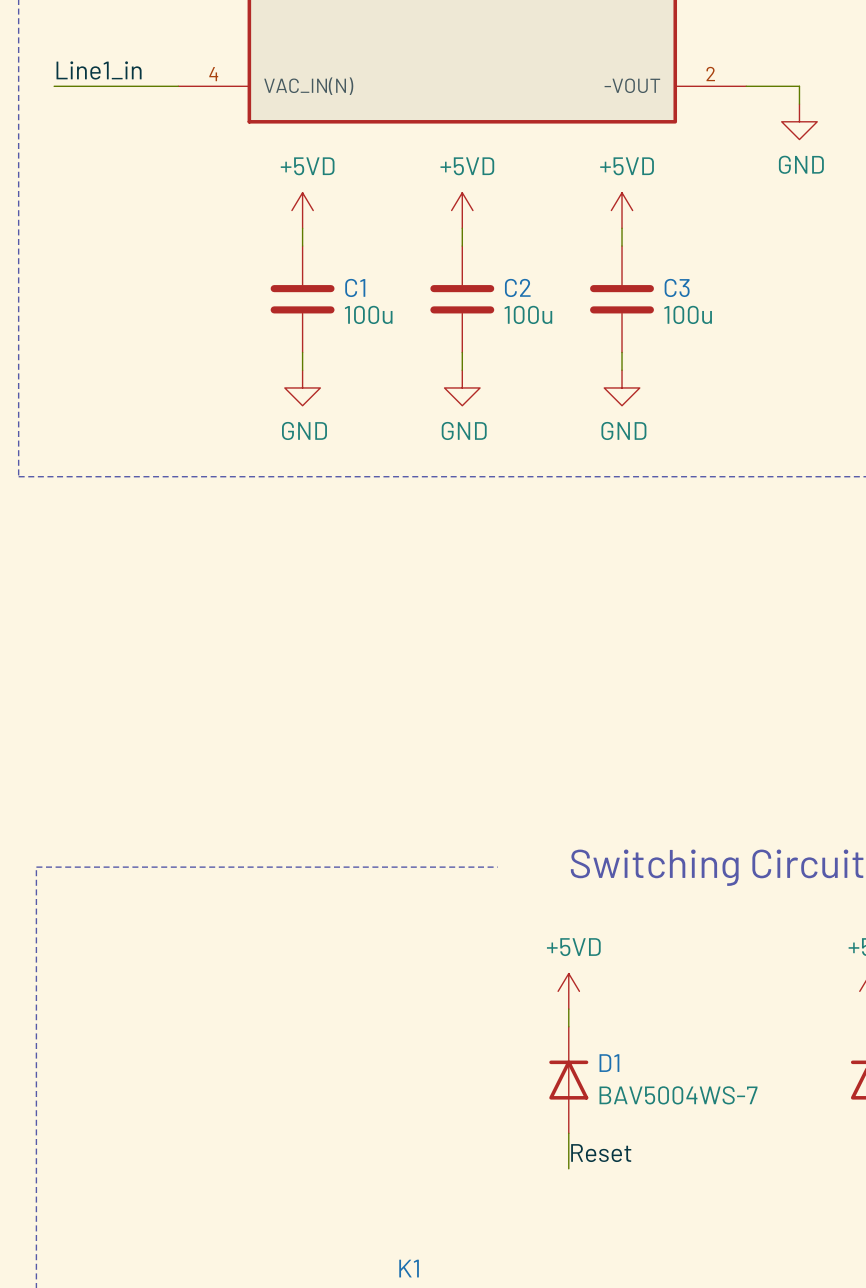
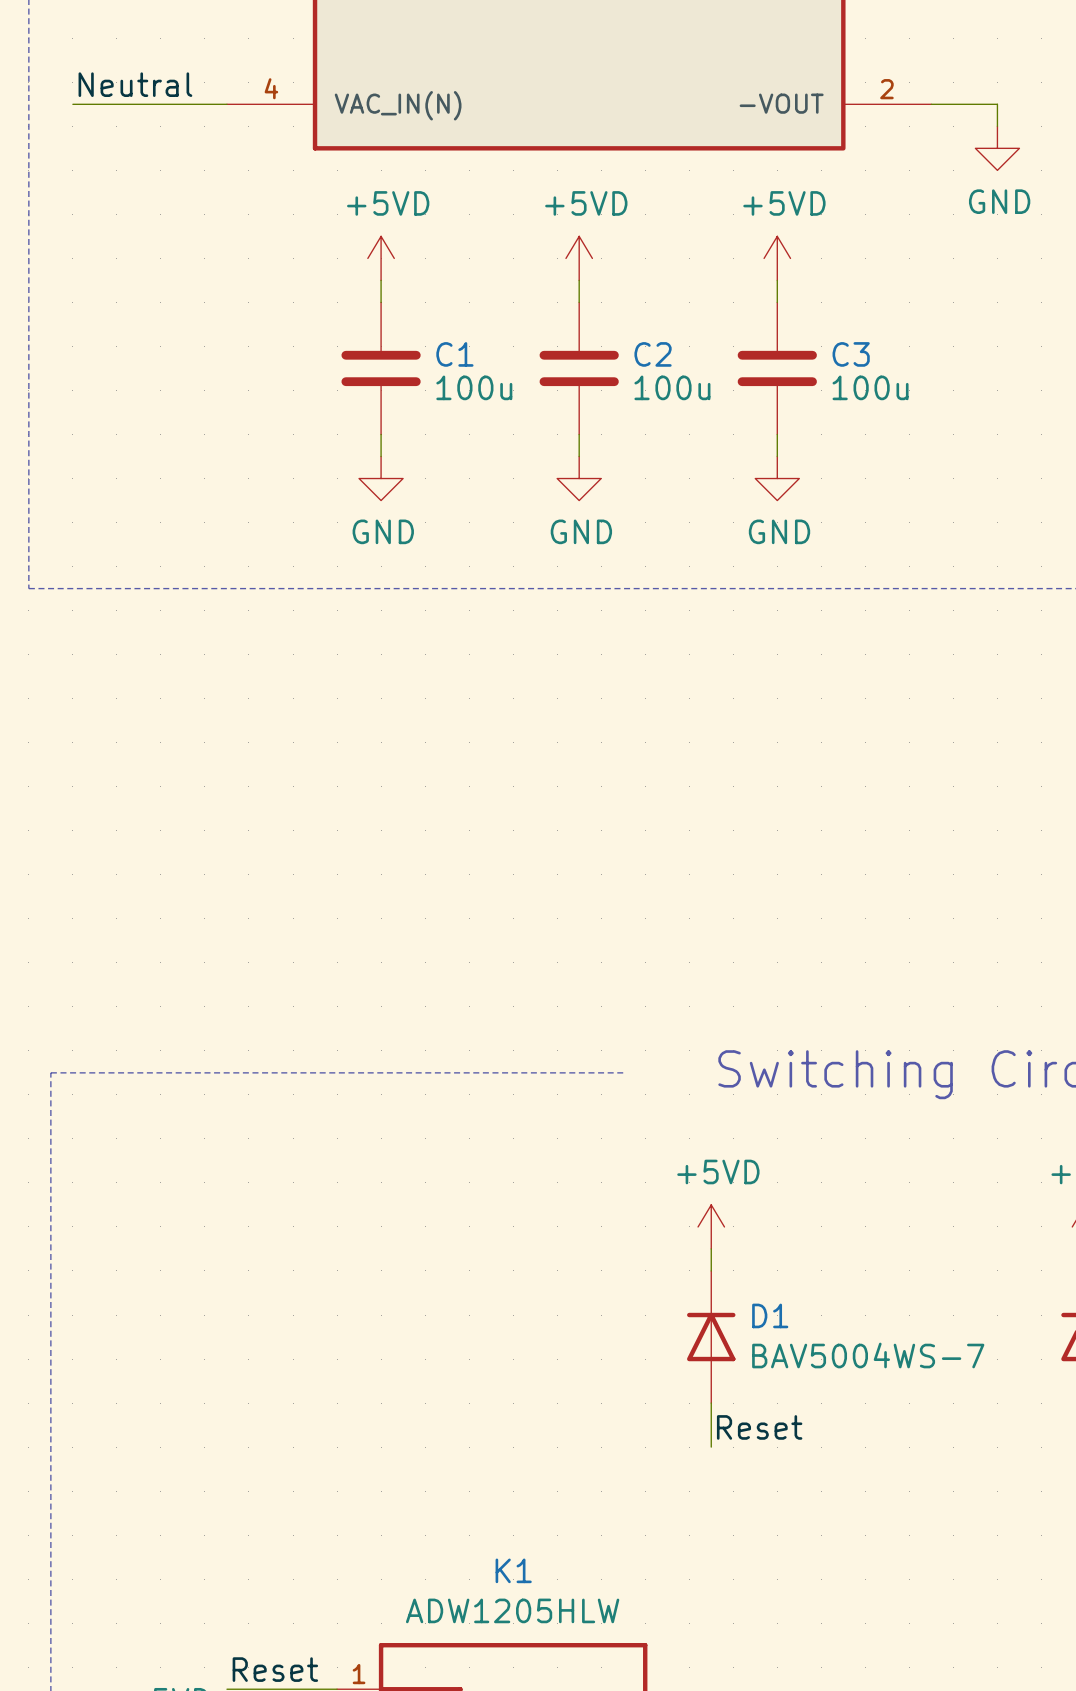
label: Line1_in (99, 70) -> Neutral (135, 84)

